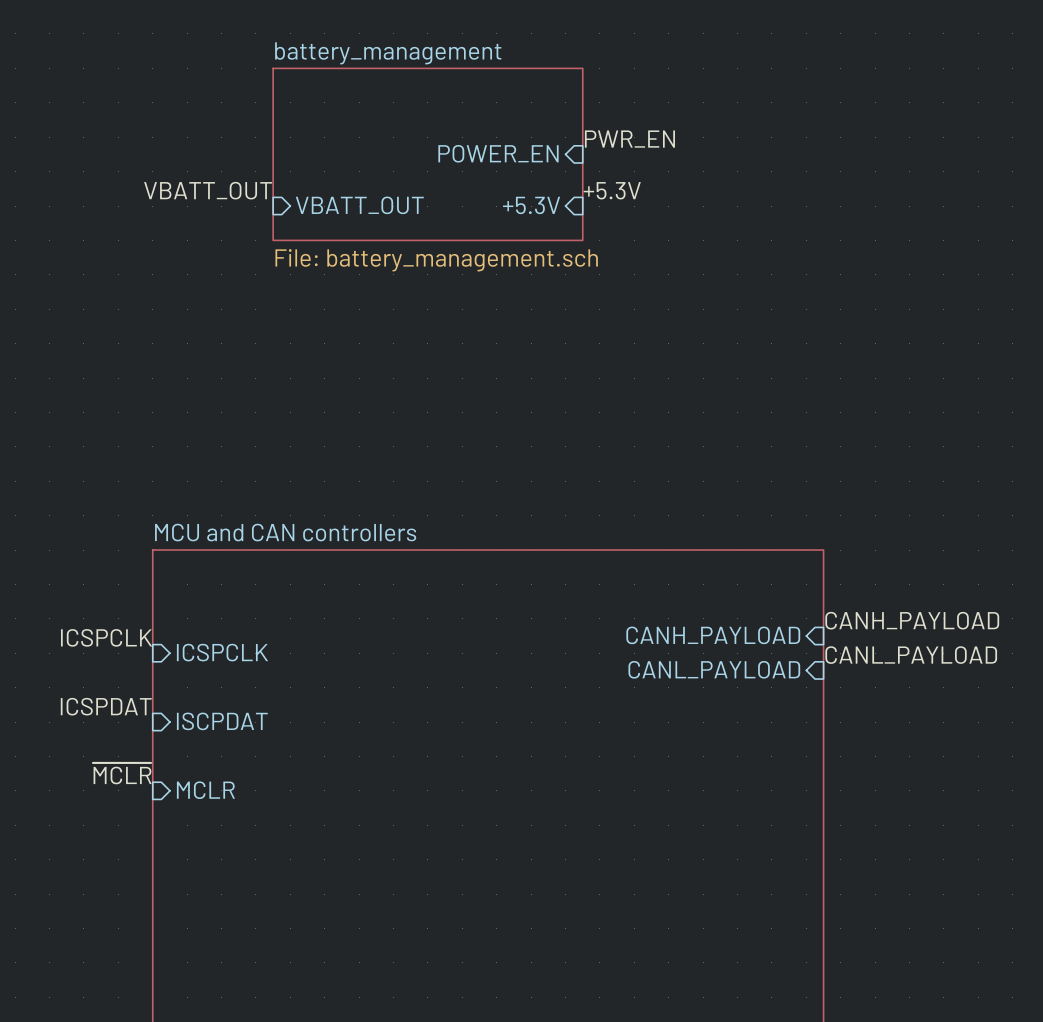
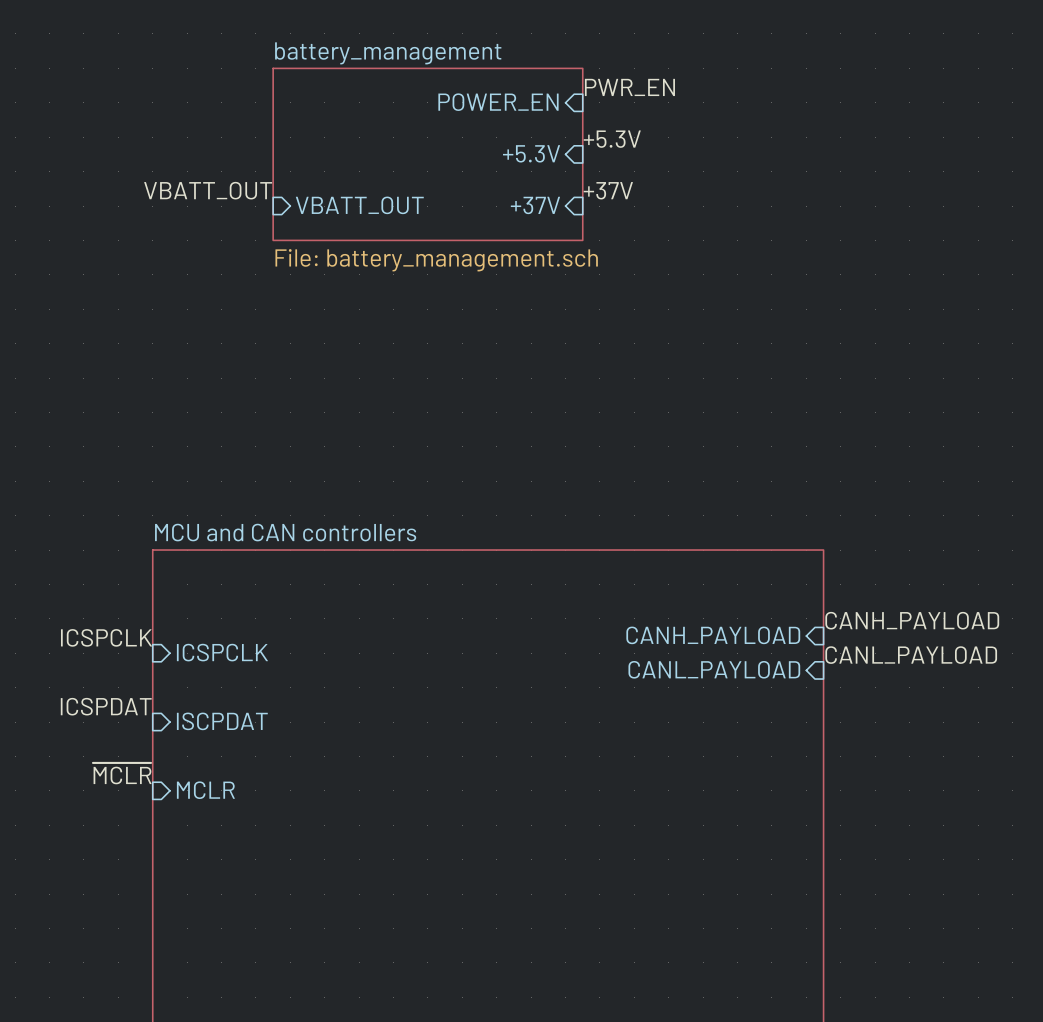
label: none -> PWR_EN (629, 87)
sheet pin: none -> POWER_EN (498, 102)
label: PWR_EN (629, 139) -> +5.3V (612, 139)
sheet pin: POWER_EN (498, 153) -> +5.3V (531, 153)
label: +5.3V (612, 190) -> +37V (608, 190)
sheet pin: +5.3V (531, 205) -> +37V (535, 205)

